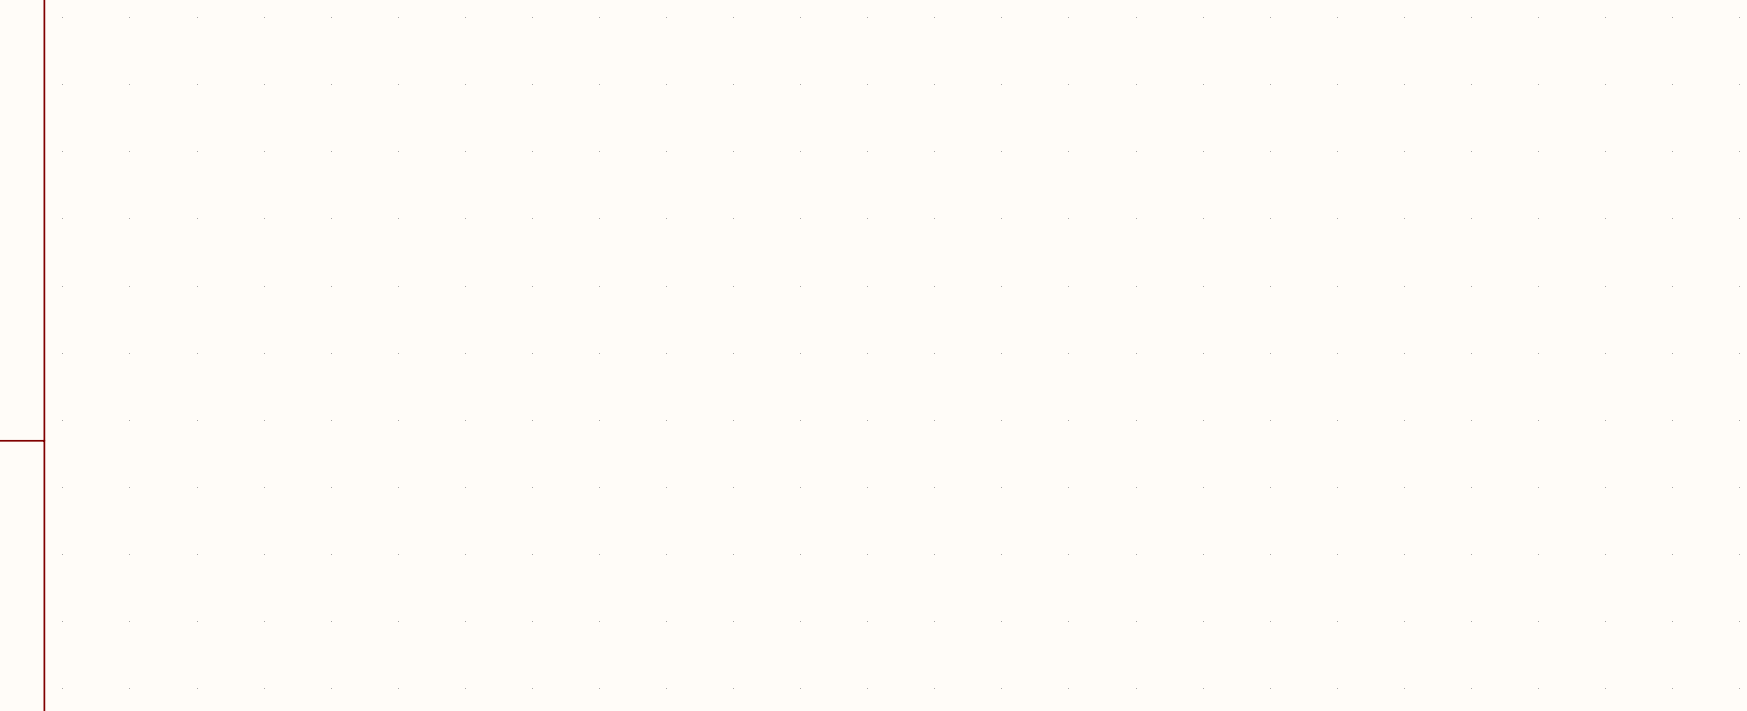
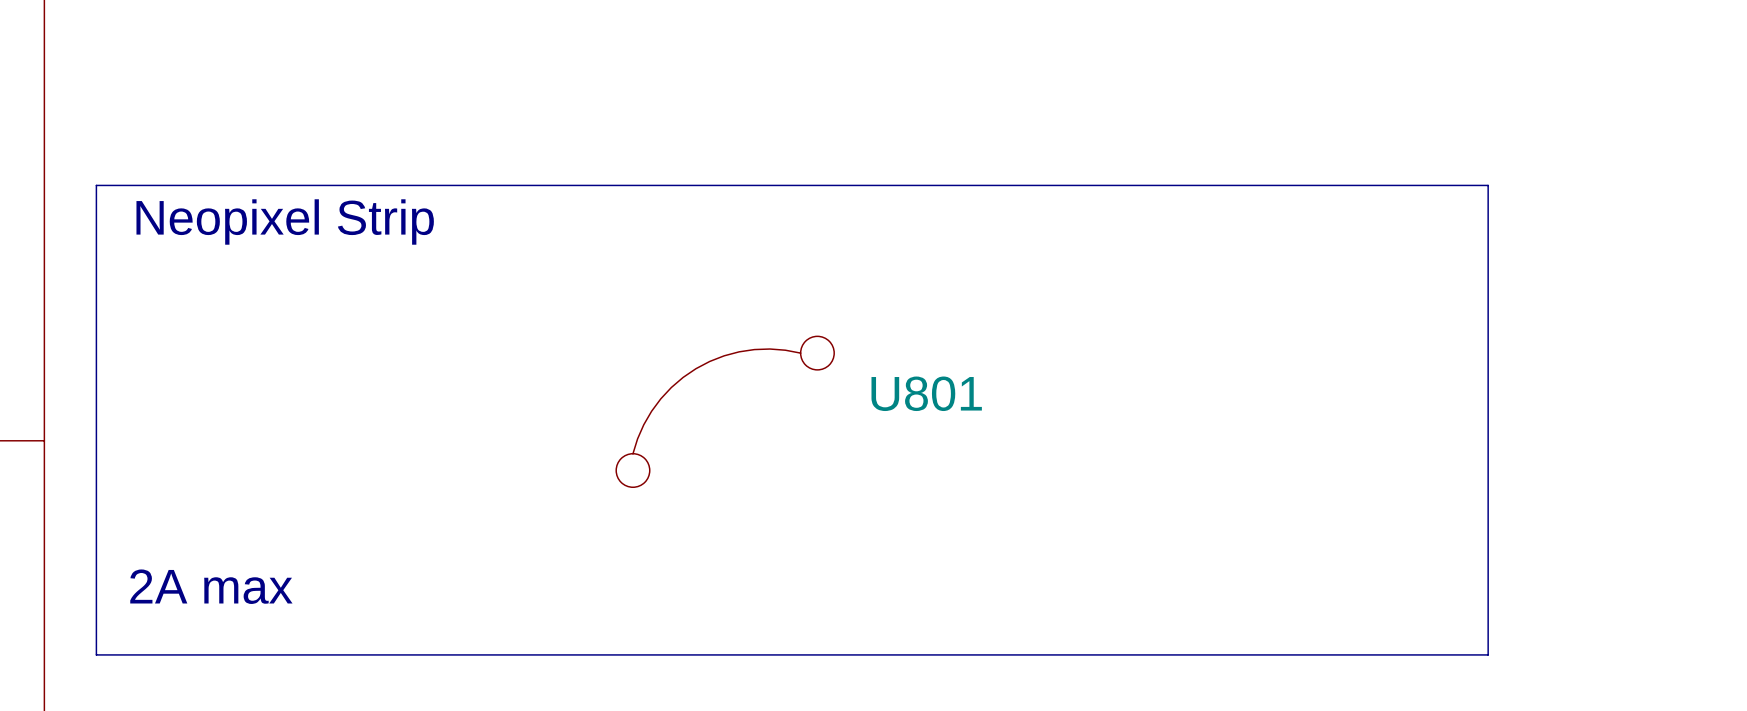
line: none -> (96, 185) (1488, 185) (1488, 654) (96, 654) (96, 185)
text: none -> Neopixel Strip (285, 221)
U801: none -> (725, 411)
text: none -> 2A max (211, 586)

